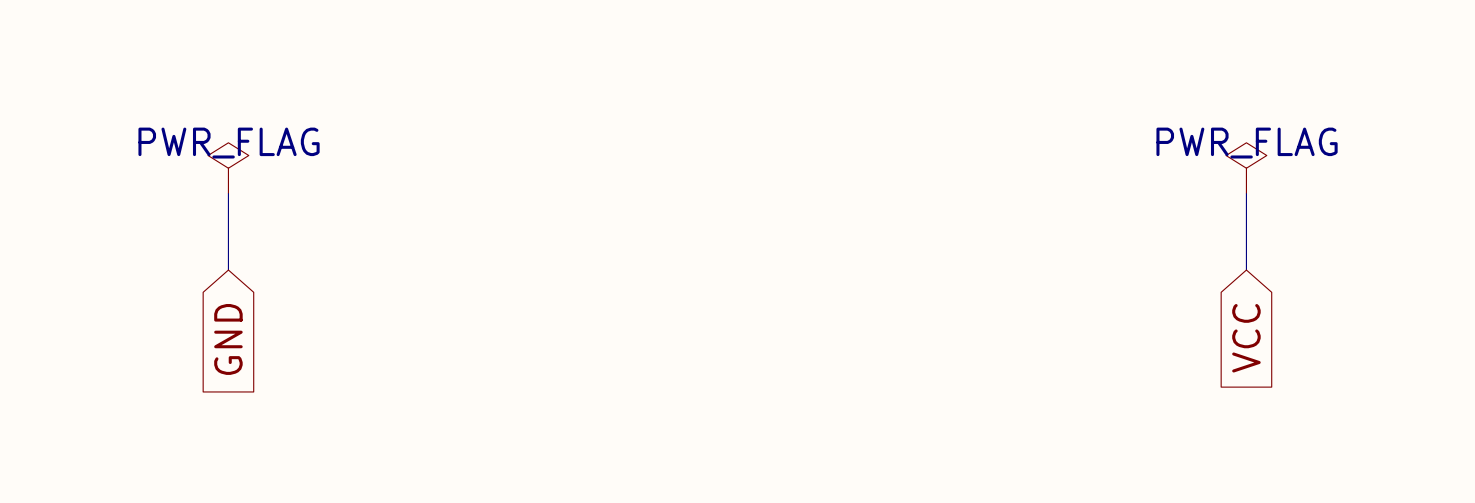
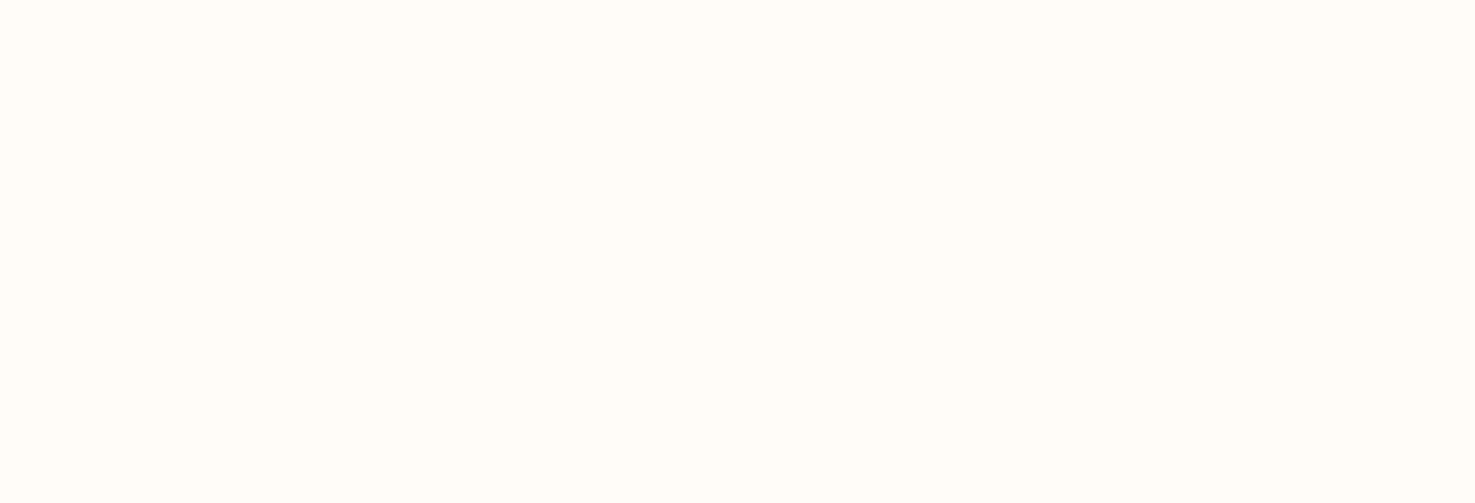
power symbol: PWR_FLAG (228, 168) -> none
power symbol: PWR_FLAG (1246, 168) -> none
wire: (228, 193) (228, 270) -> none
wire: (1246, 193) (1246, 270) -> none
global label: VCC (1246, 338) -> none
global label: GND (228, 339) -> none

